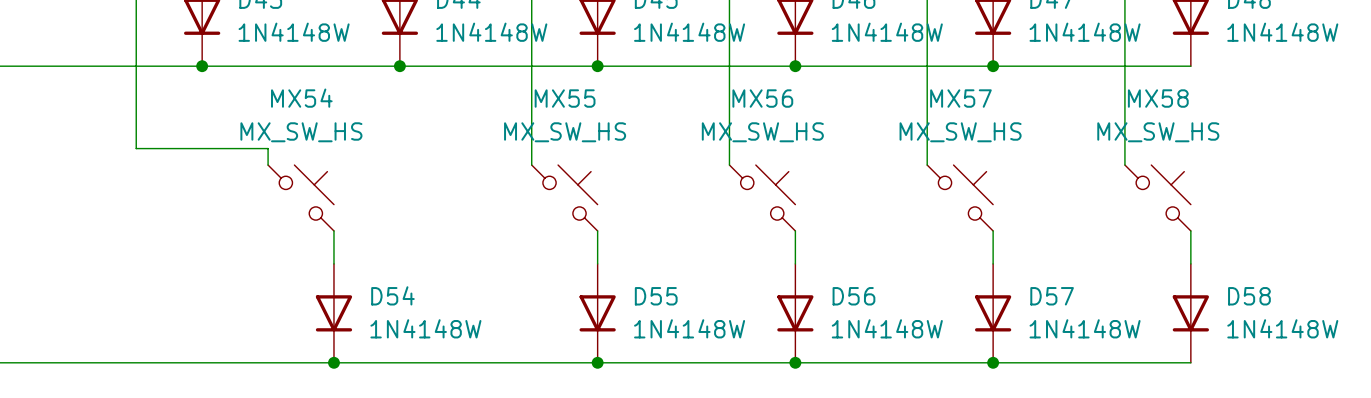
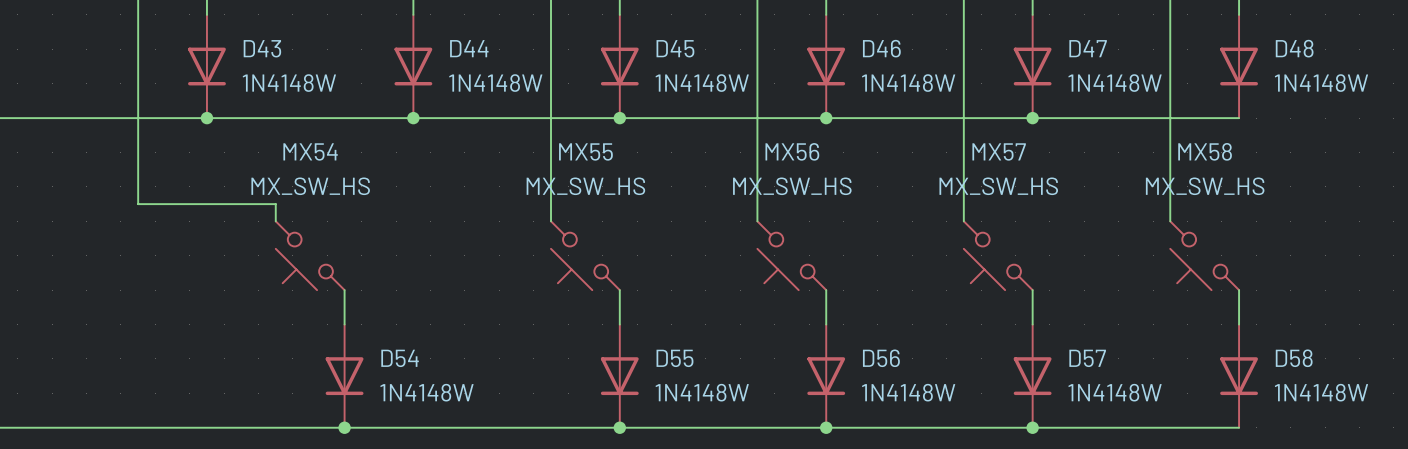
MX54 rotation: 0° (301, 198) -> 180° (310, 255)
MX55 rotation: 0° (564, 198) -> 180° (585, 255)
MX56 rotation: 0° (762, 198) -> 180° (791, 255)
MX57 rotation: 0° (960, 198) -> 180° (998, 255)
MX58 rotation: 0° (1157, 198) -> 180° (1204, 255)

